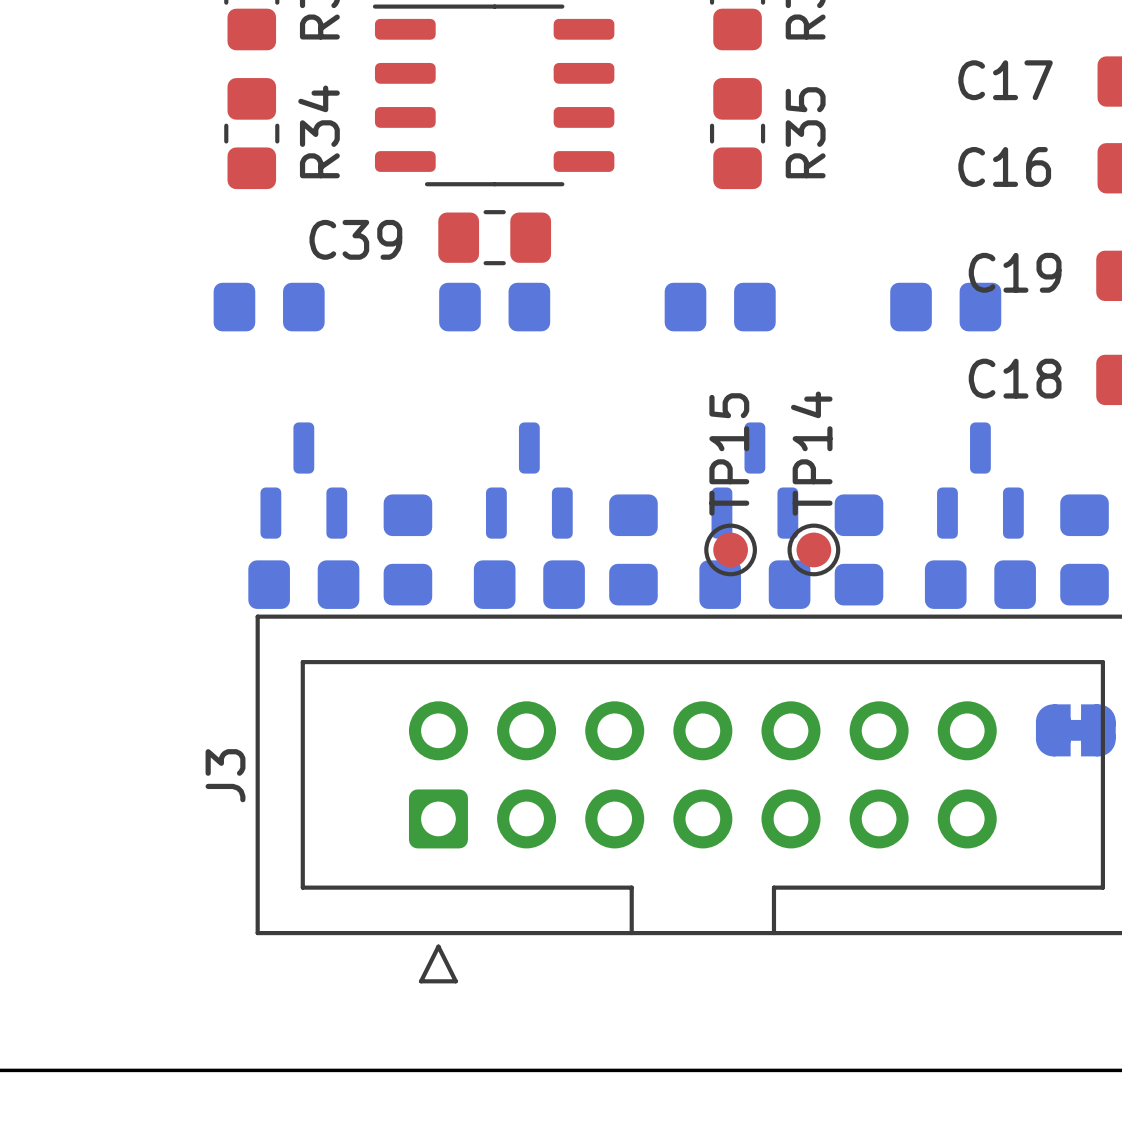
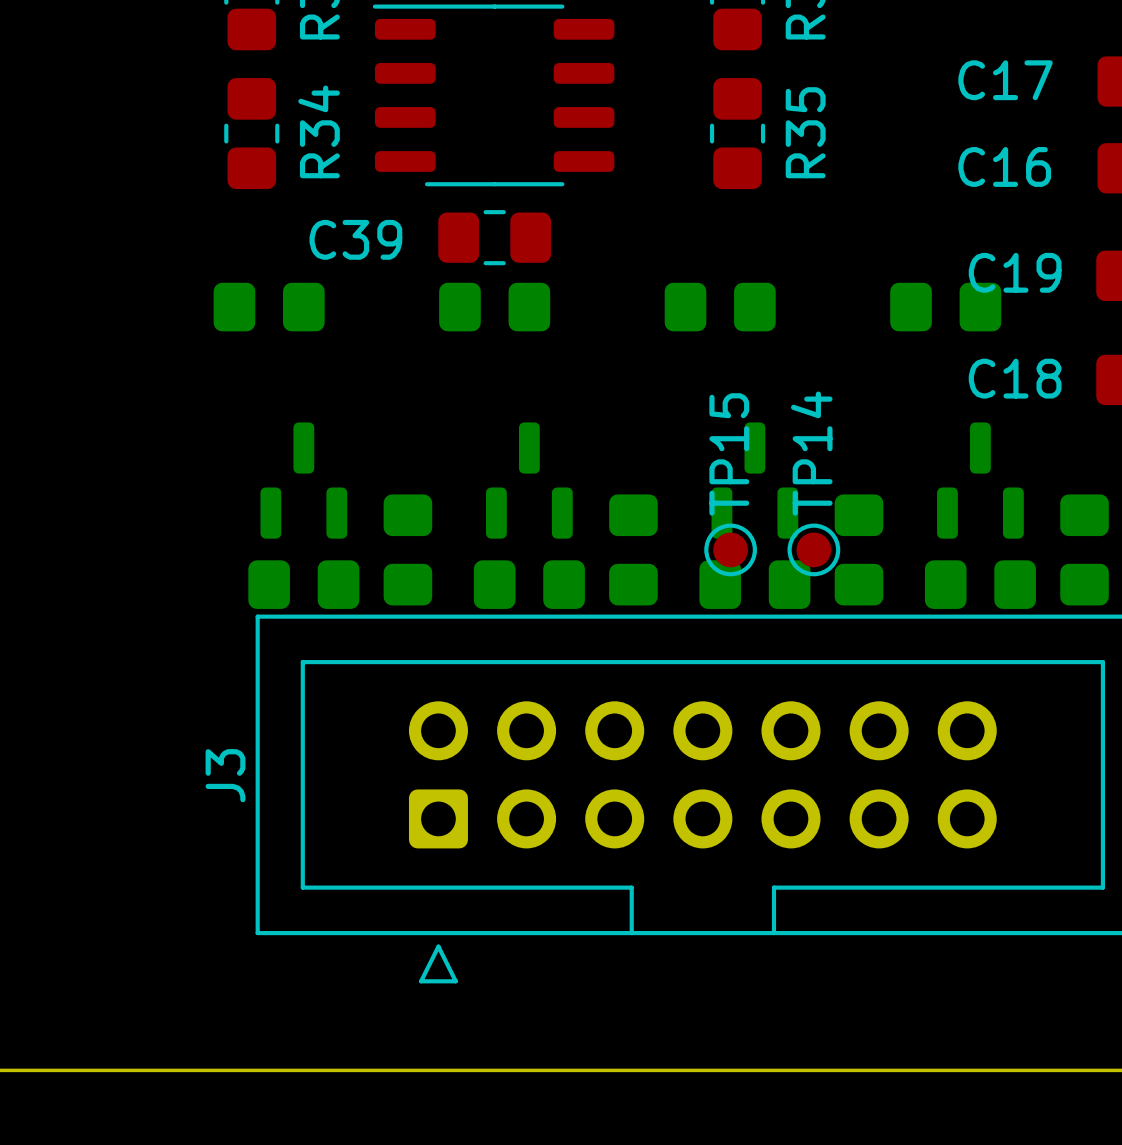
part: (1075, 730) -> none

